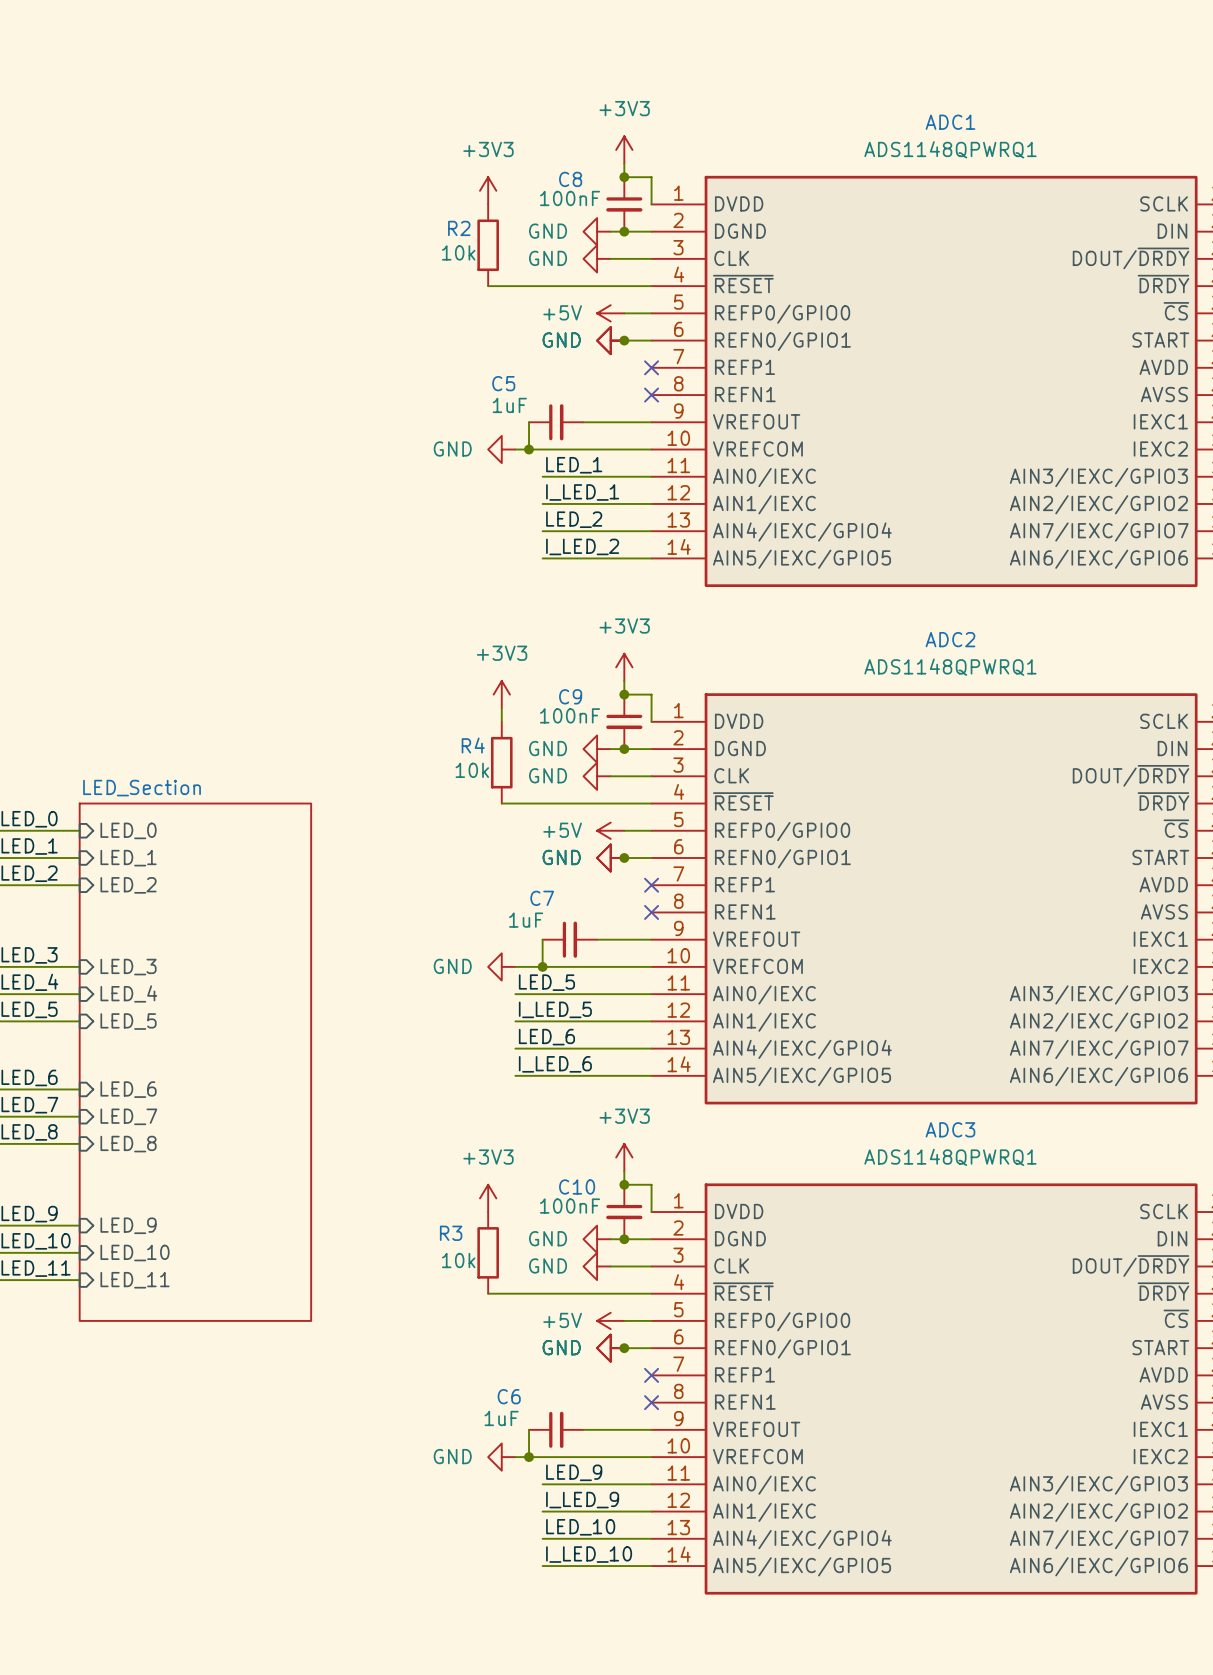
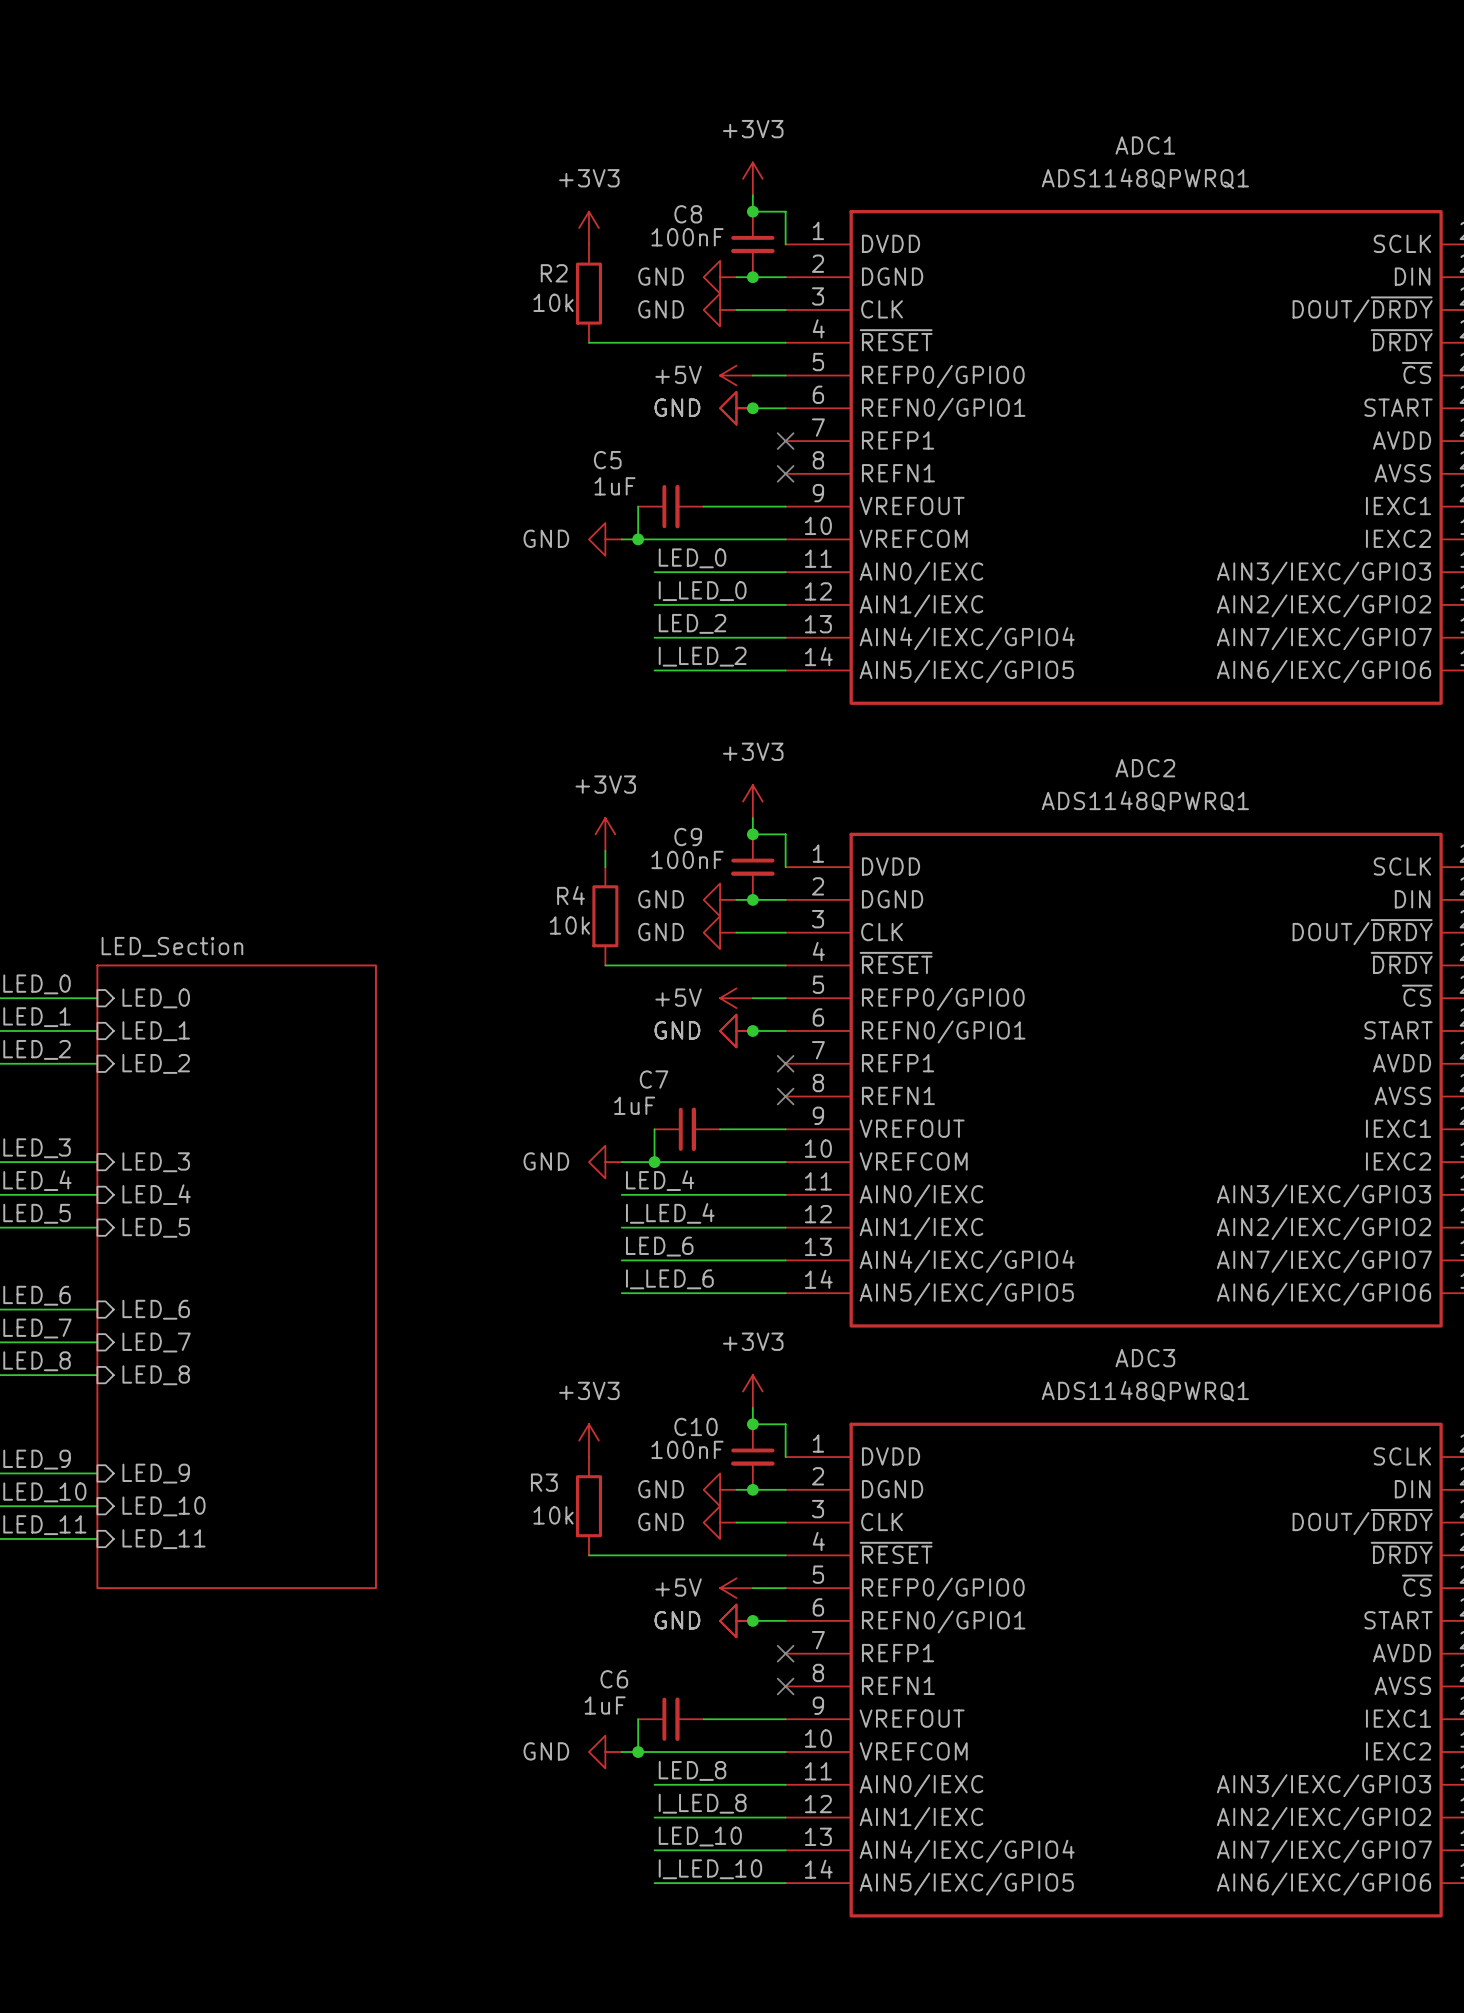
label: LED_1 (574, 465) -> LED_0 (692, 558)
label: I_LED_1 (582, 492) -> I_LED_0 (702, 591)
label: LED_5 (546, 982) -> LED_4 (660, 1180)
label: I_LED_5 (555, 1009) -> I_LED_4 (670, 1213)
label: LED_9 (574, 1472) -> LED_8 (692, 1770)
label: I_LED_9 (582, 1500) -> I_LED_8 (702, 1803)

